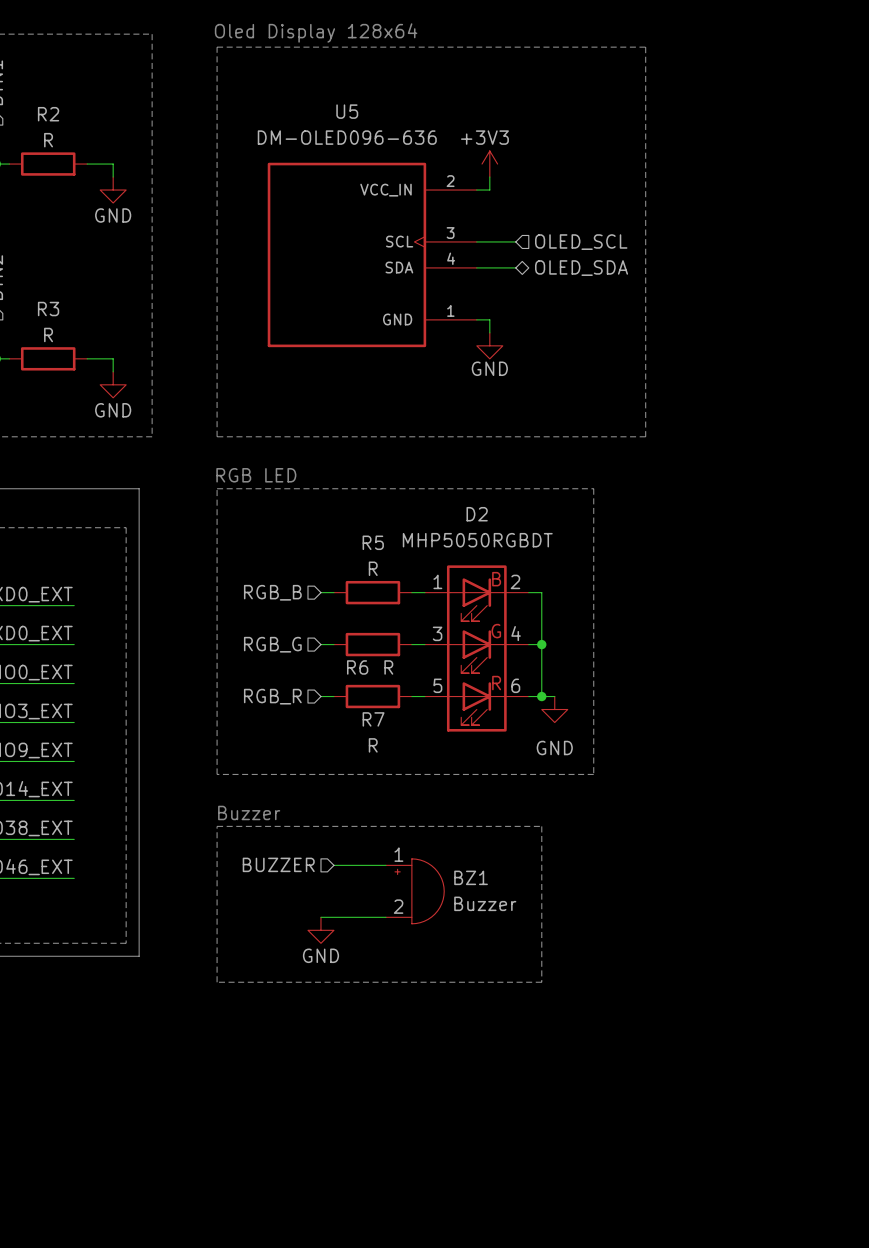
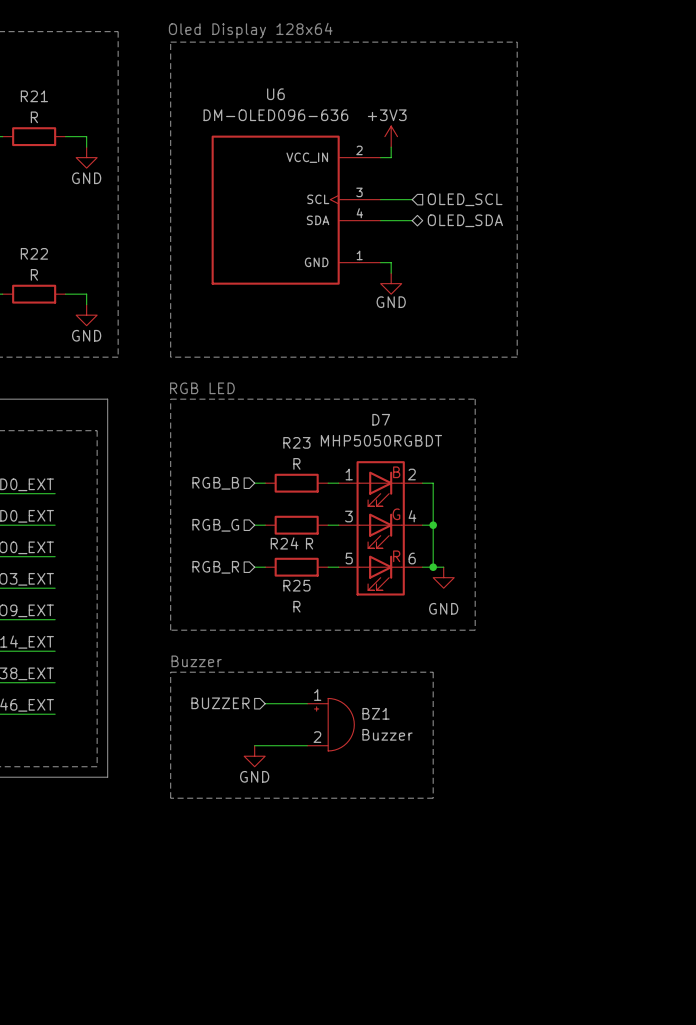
U5 name: U5 (347, 111) -> U6 (275, 94)
R2 name: R2 (48, 114) -> R21 (34, 96)
R3 name: R3 (48, 309) -> R22 (34, 253)
D2 name: D2 (477, 514) -> D7 (381, 419)
R5 name: R5 (373, 542) -> R23 (296, 442)
R6 name: R6 (357, 667) -> R24 (284, 543)
R7 name: R7 (373, 719) -> R25 (296, 585)

